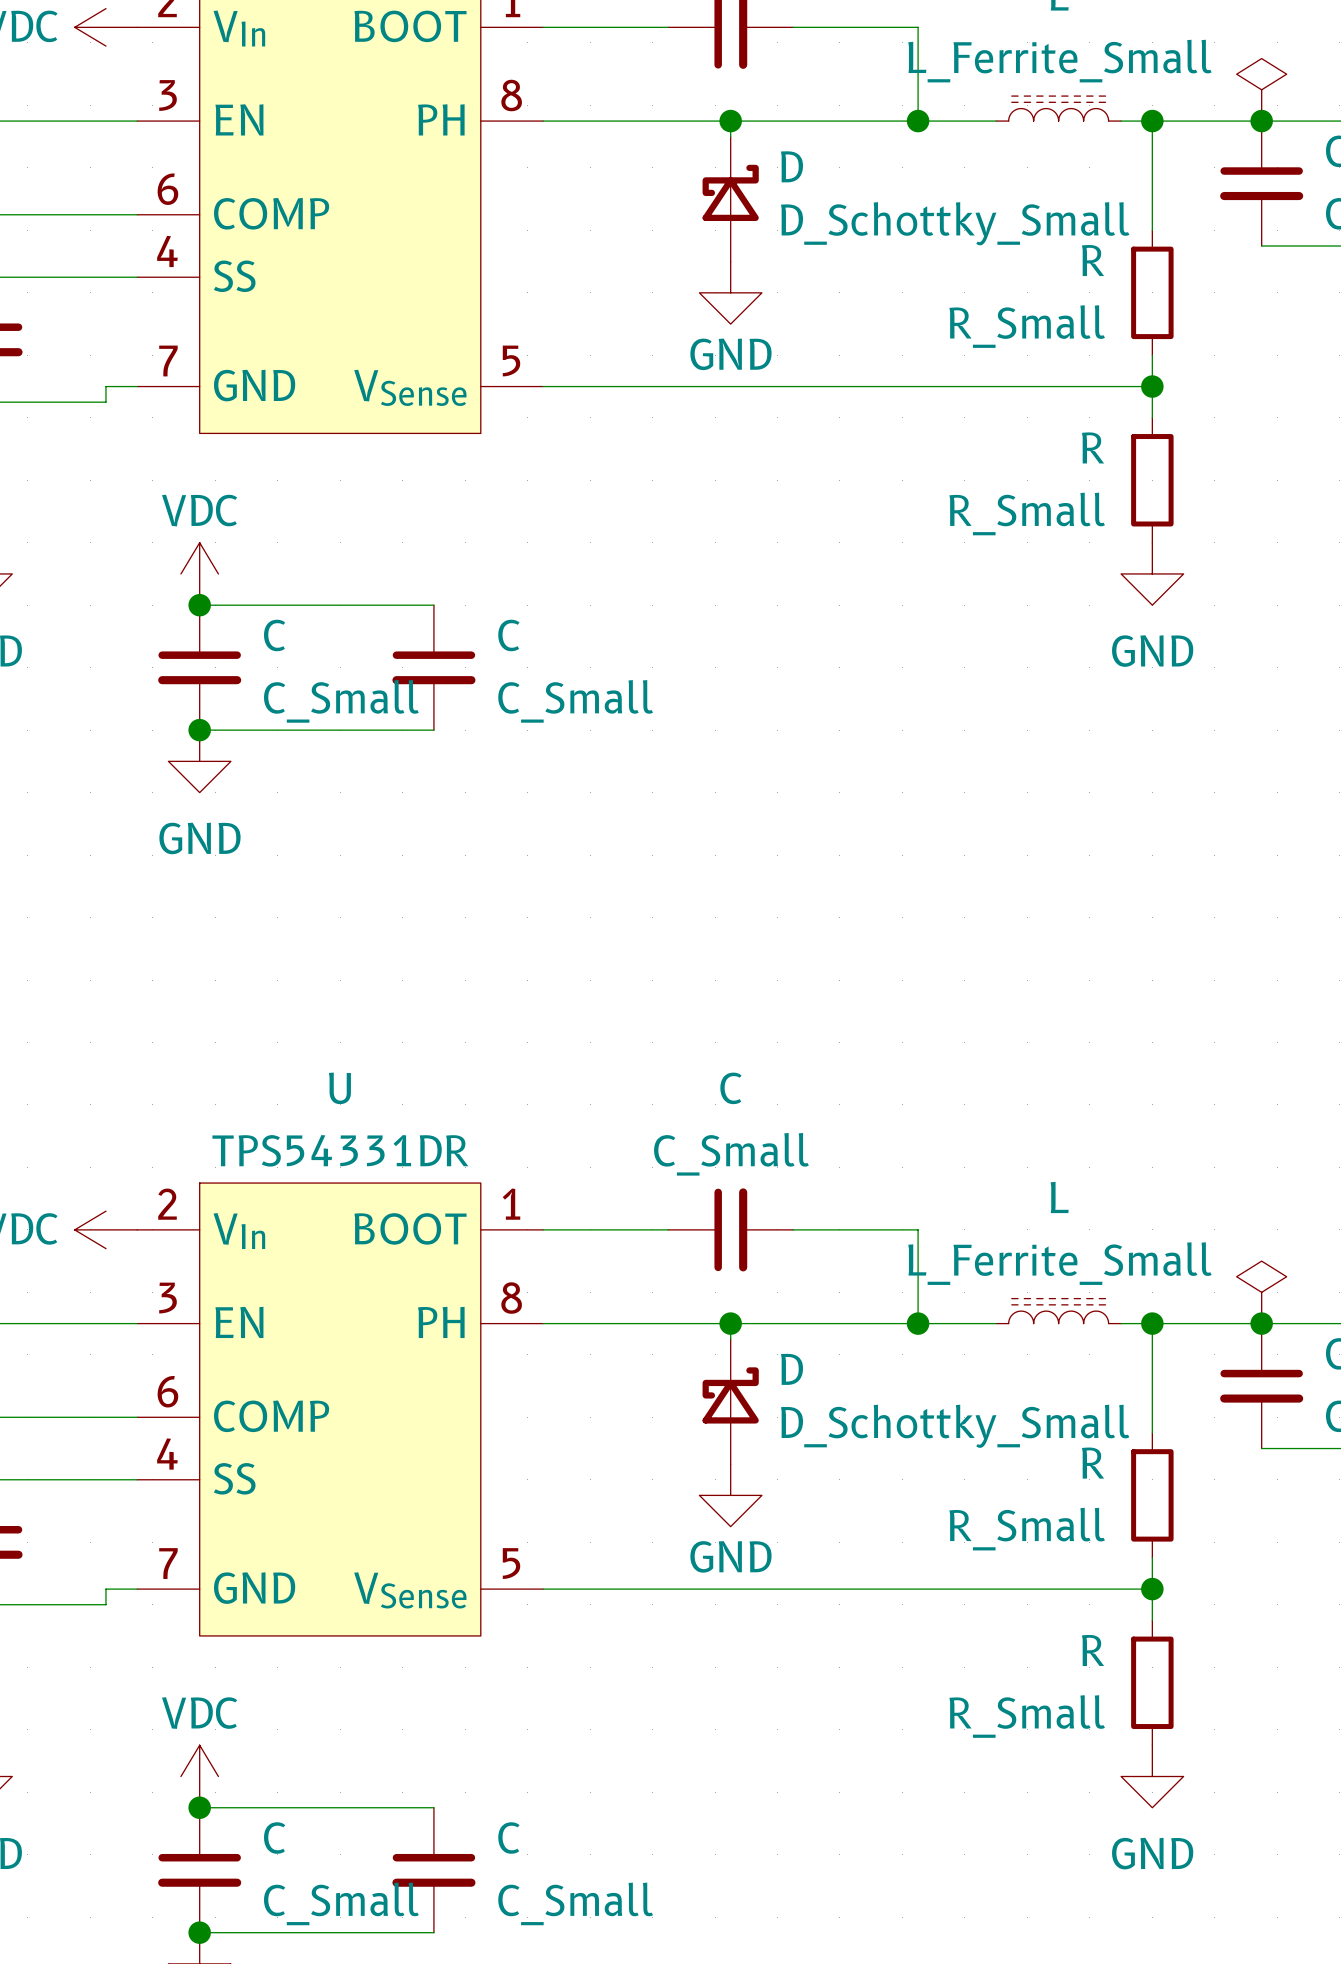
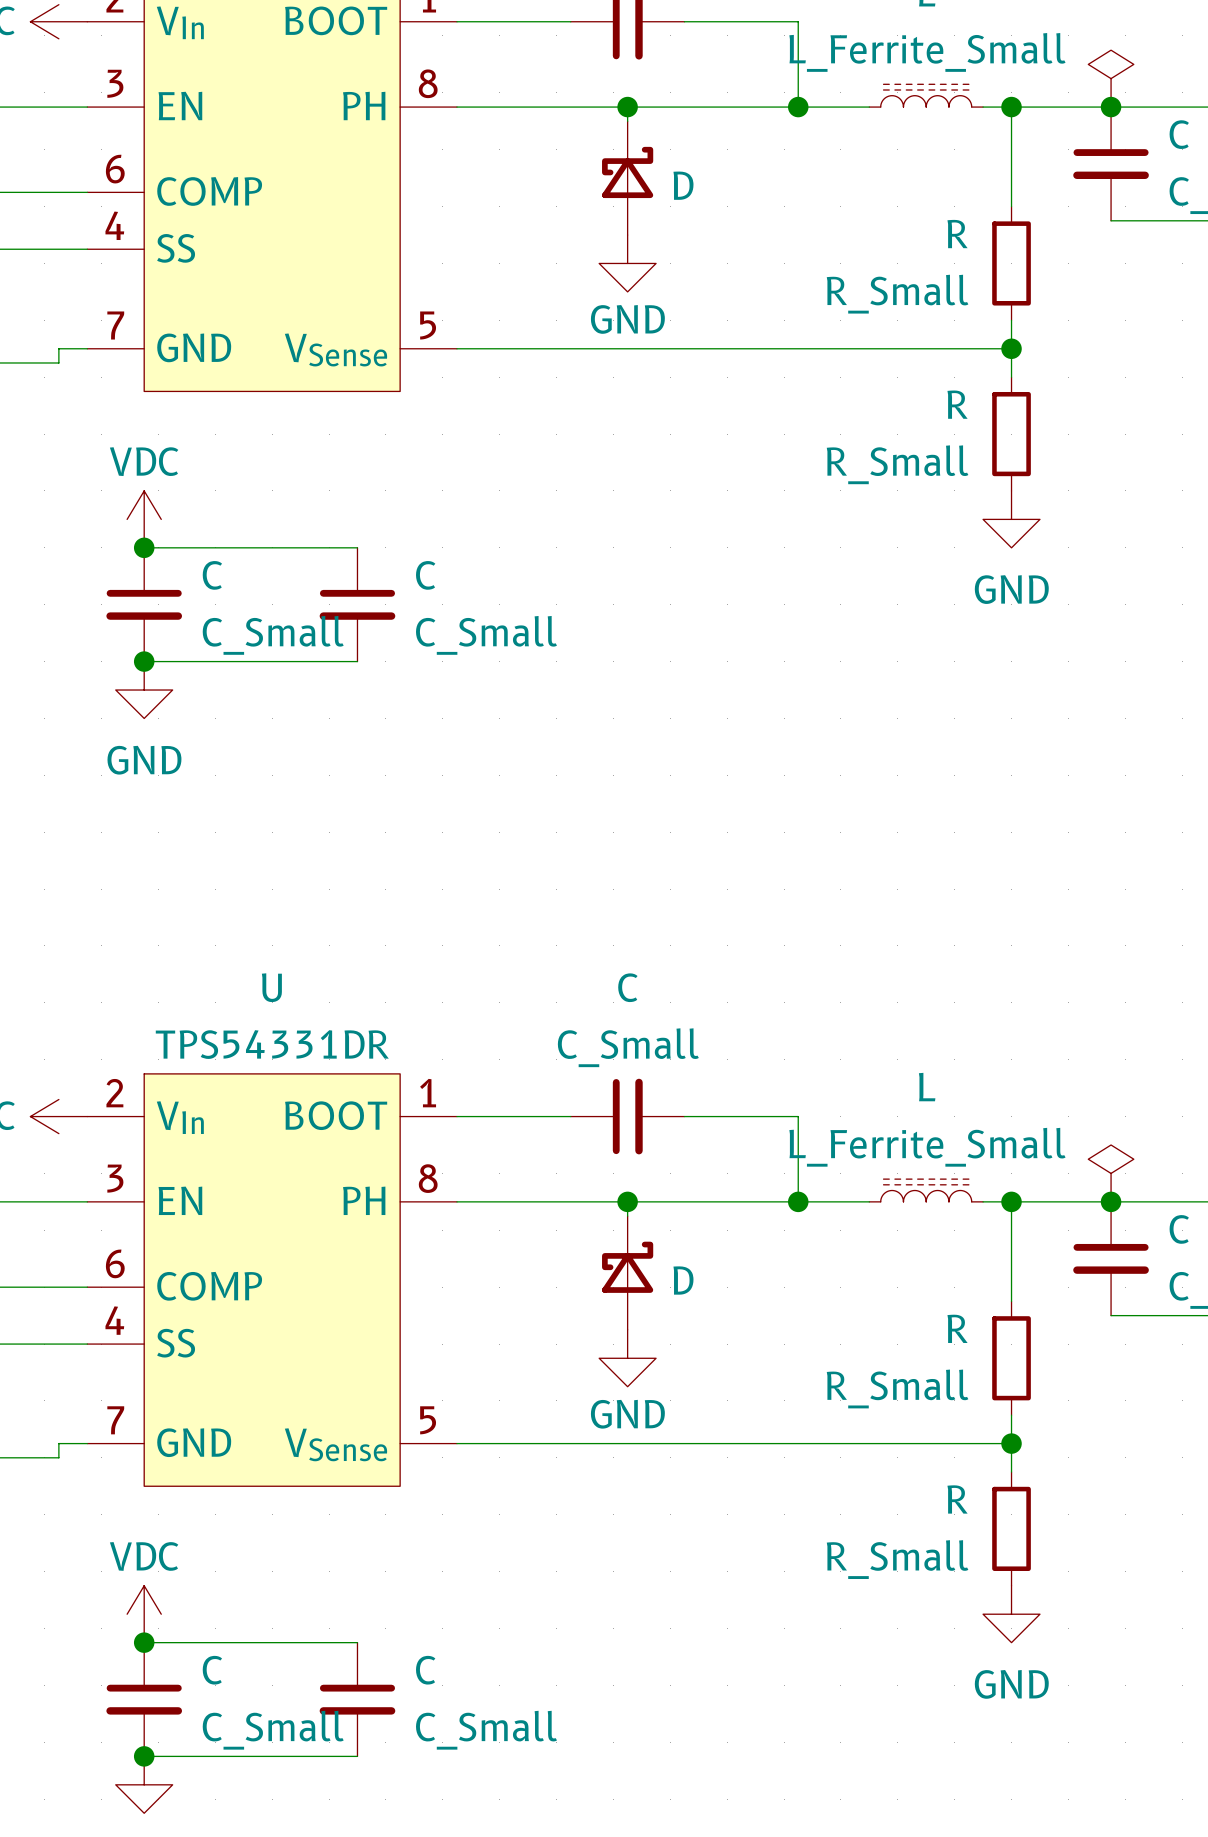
D name position: D (792, 166) -> D (683, 185)
D value: D_Schottky_Small (955, 223) -> none
D name position: D (792, 1369) -> D (683, 1280)
D value: D_Schottky_Small (955, 1426) -> none

